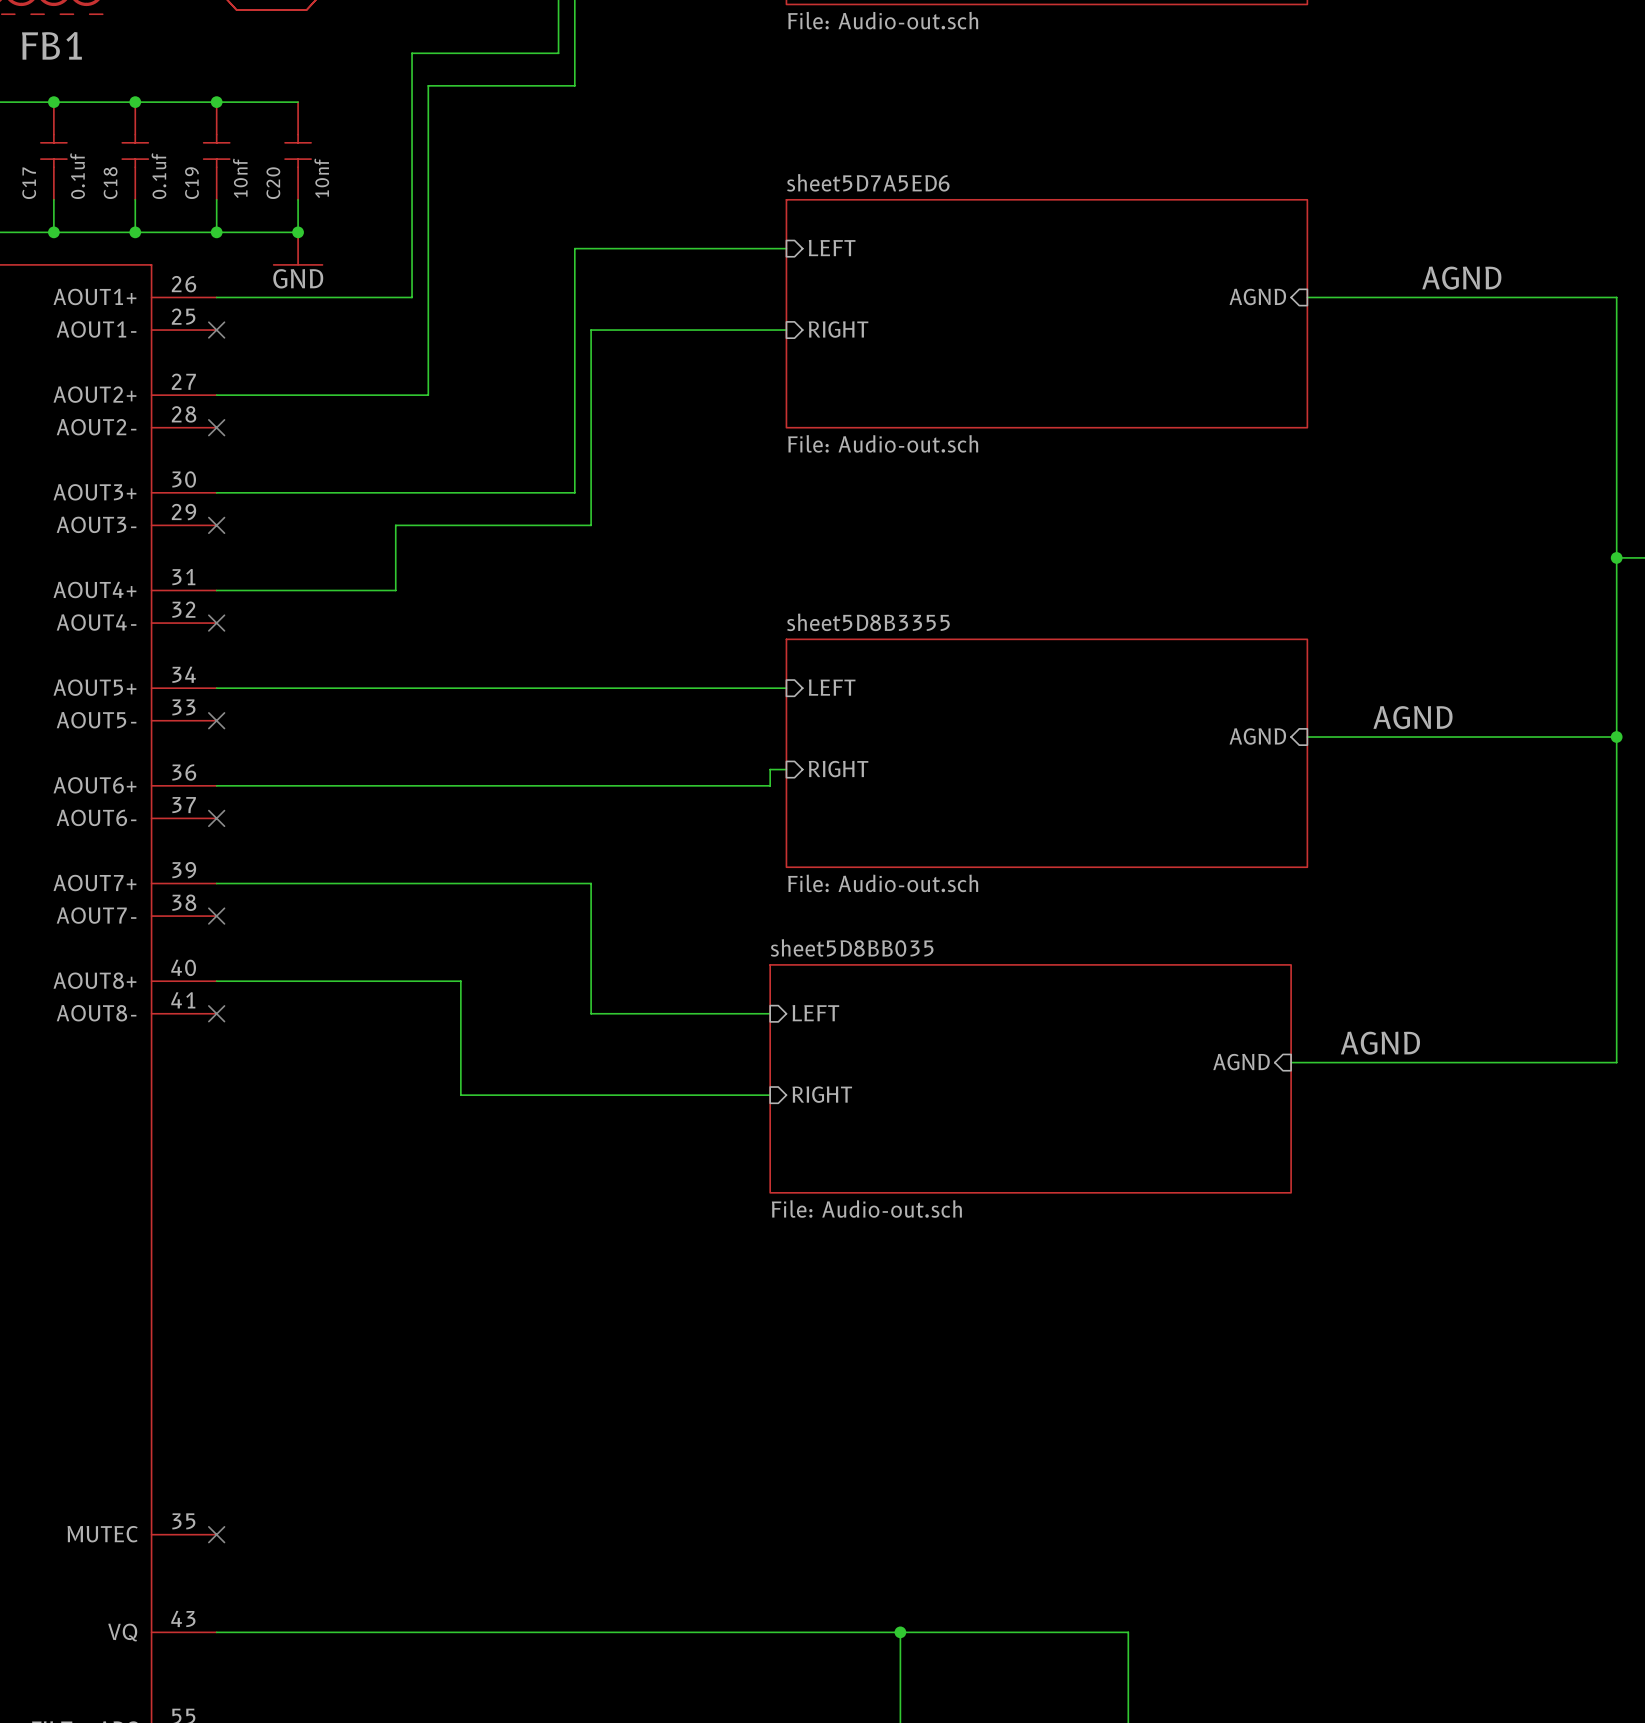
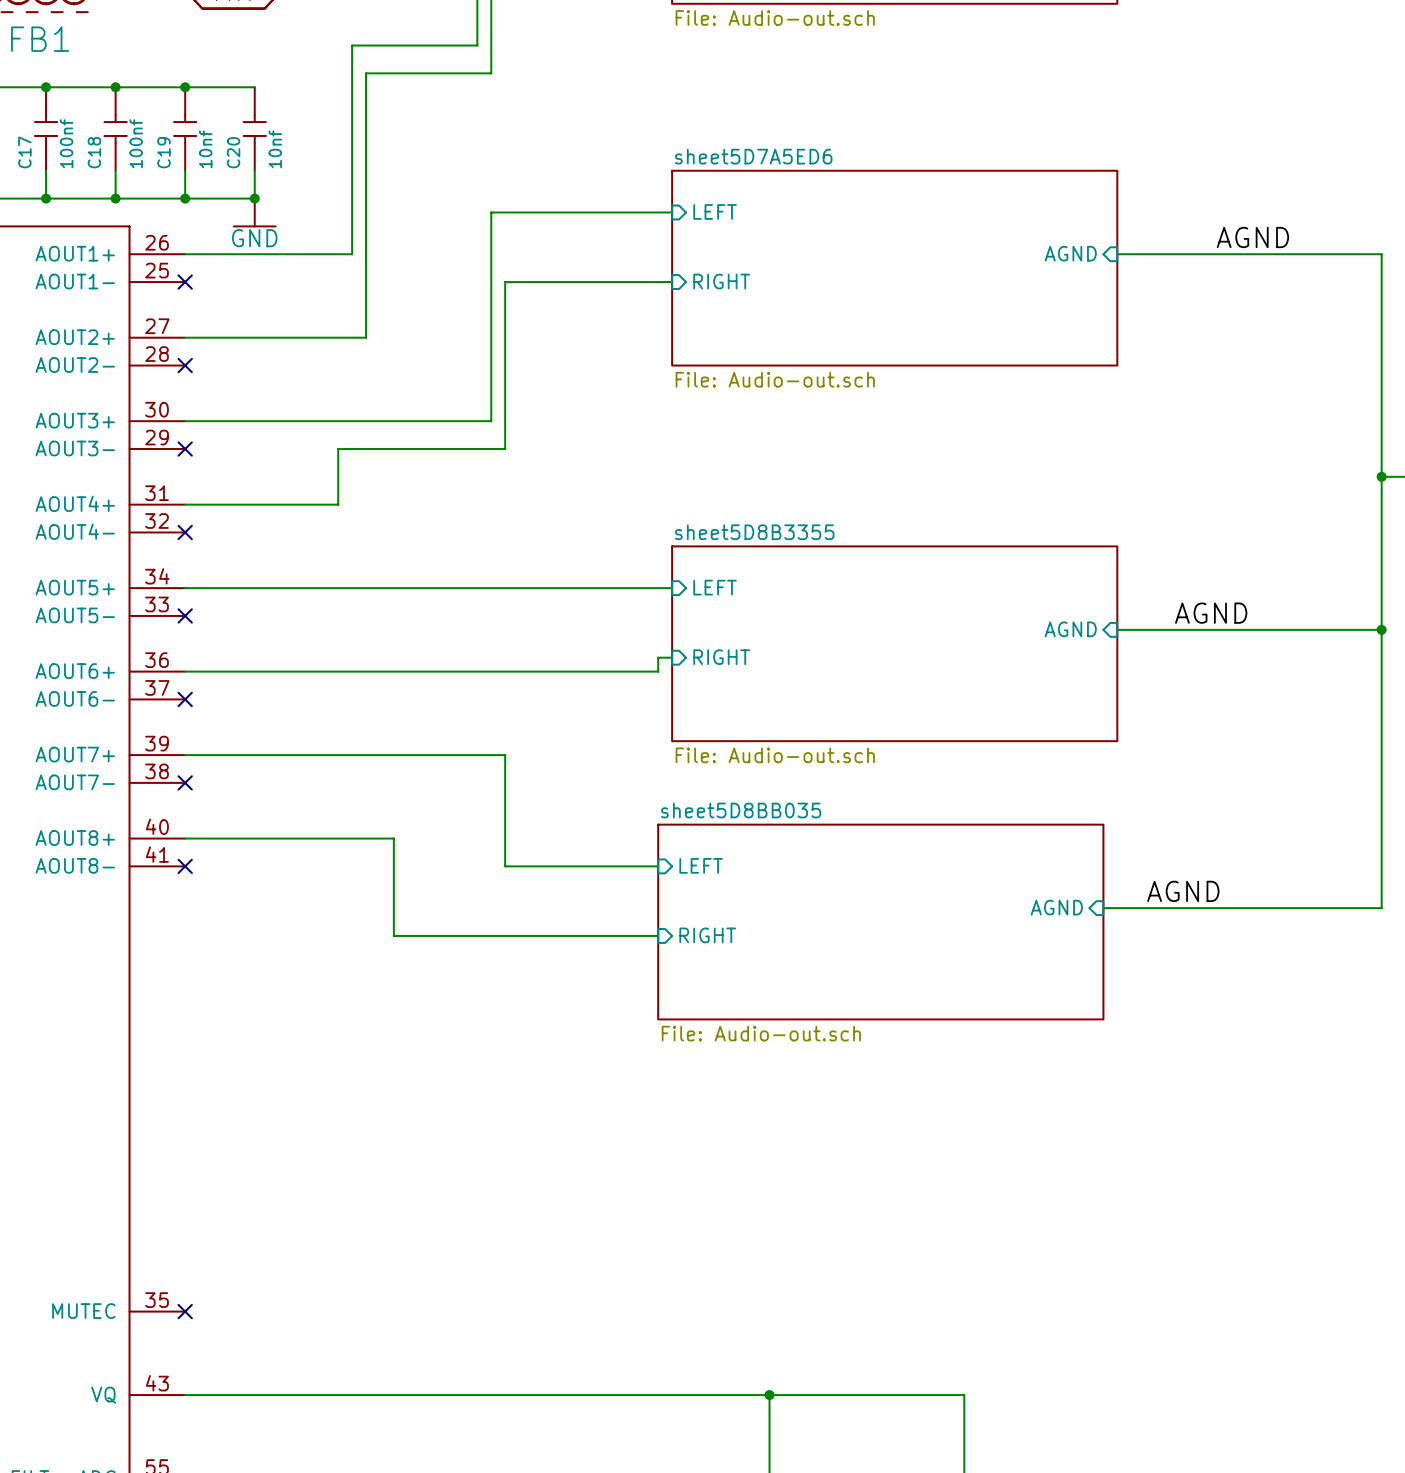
C17 value: 0.1uf (77, 176) -> 100nf (66, 143)
C18 value: 0.1uf (158, 176) -> 100nf (136, 143)

